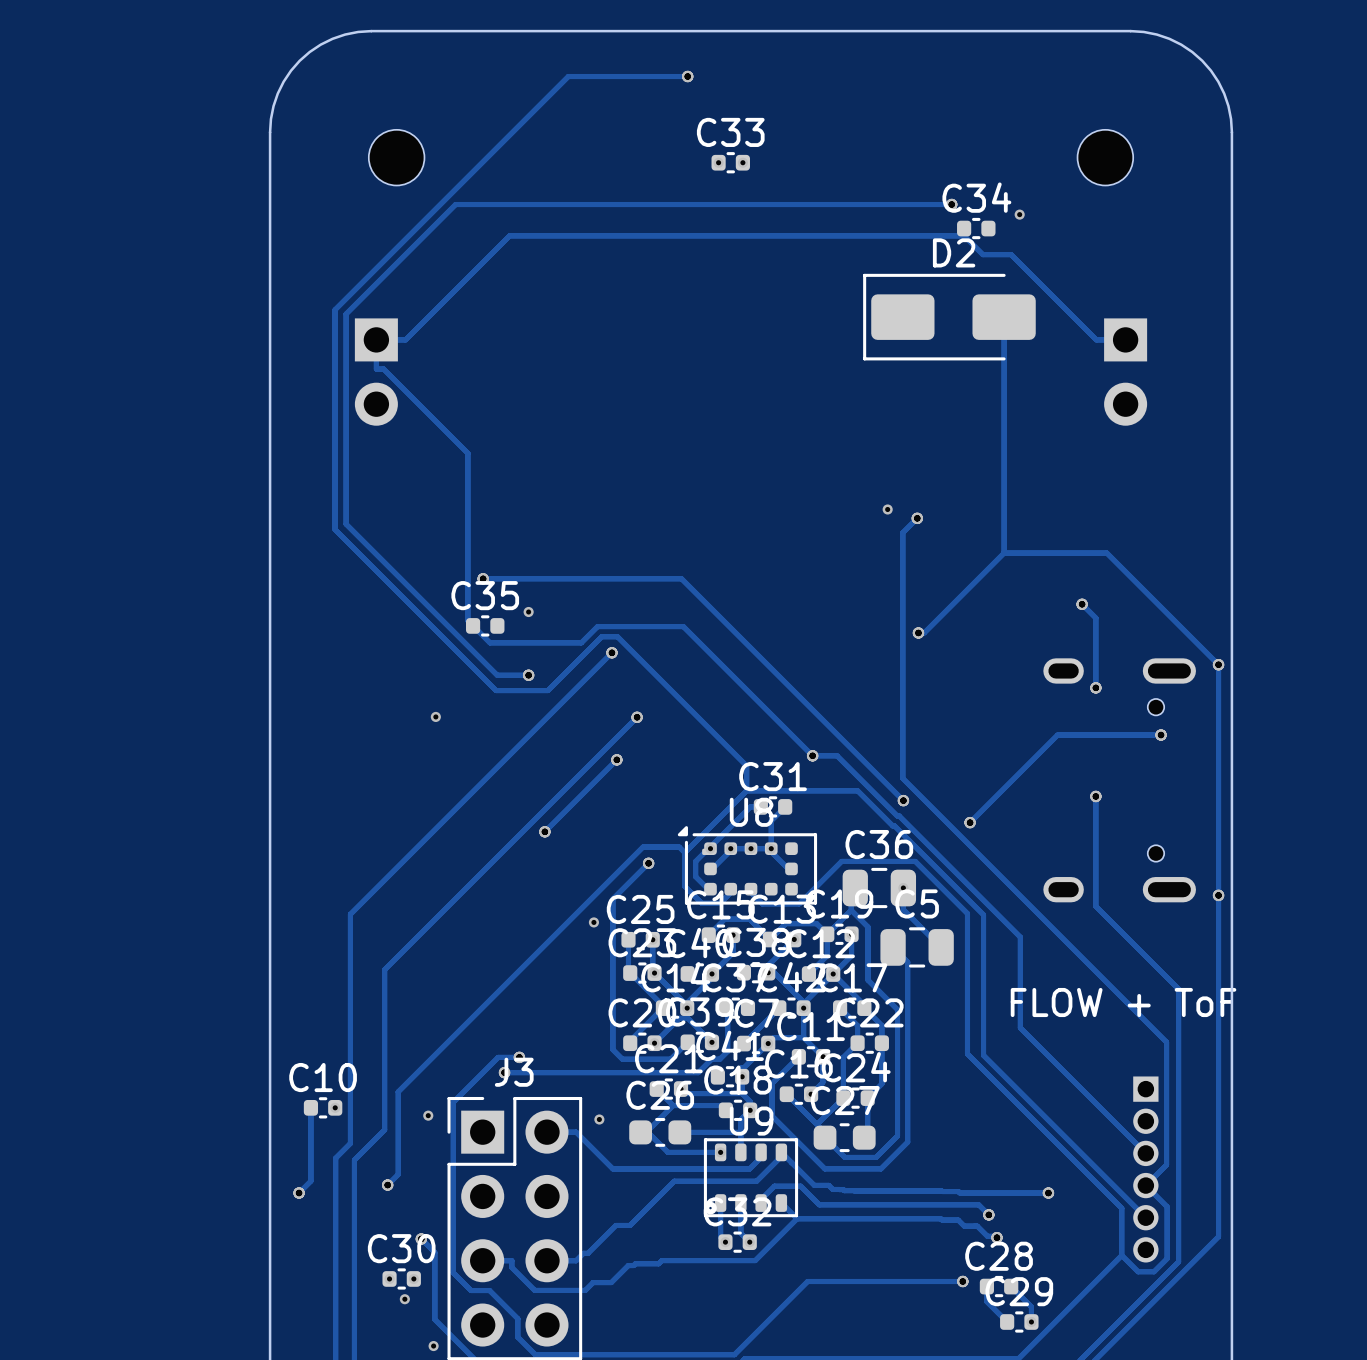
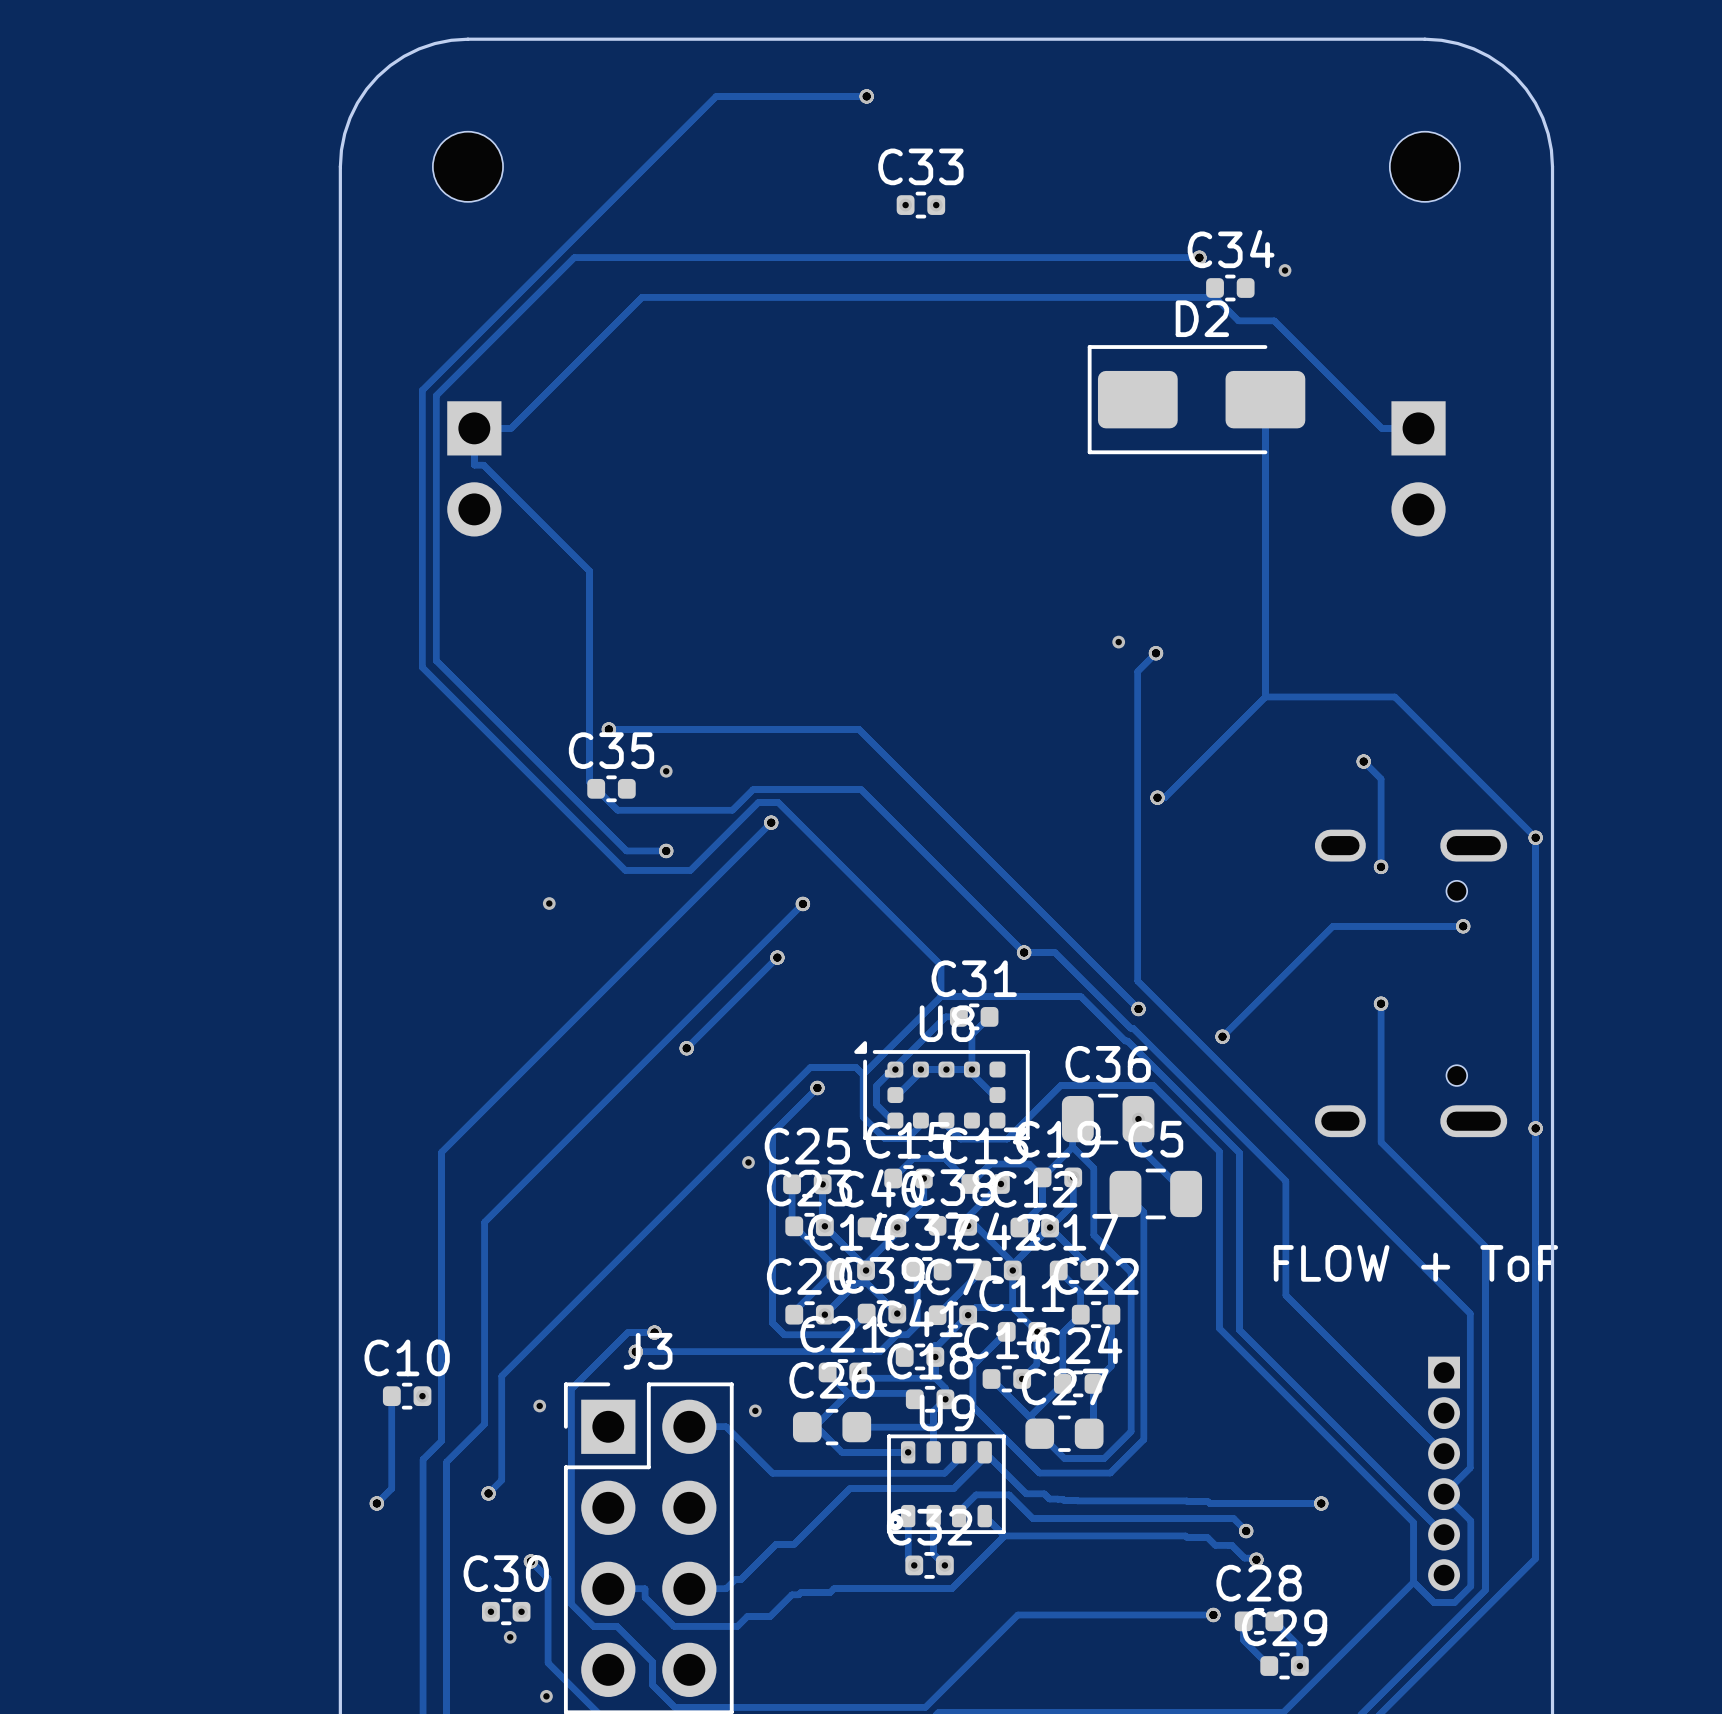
part position: (396, 157) -> (467, 166)
part position: (1105, 157) -> (1424, 166)

